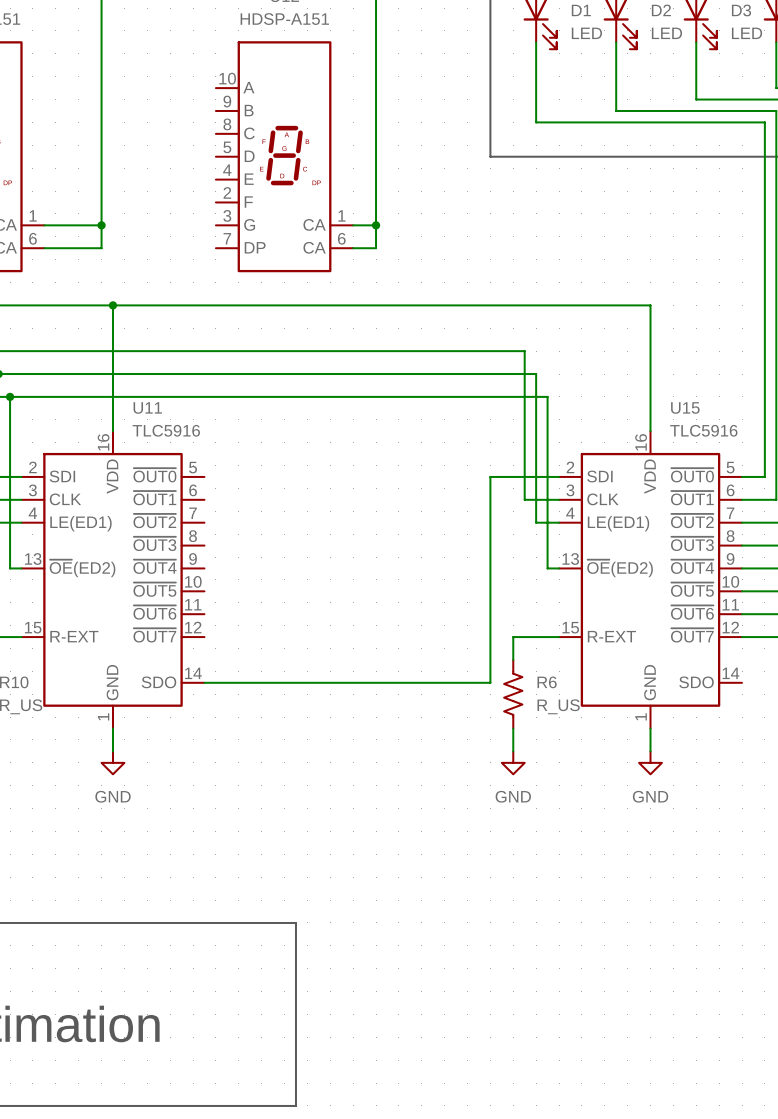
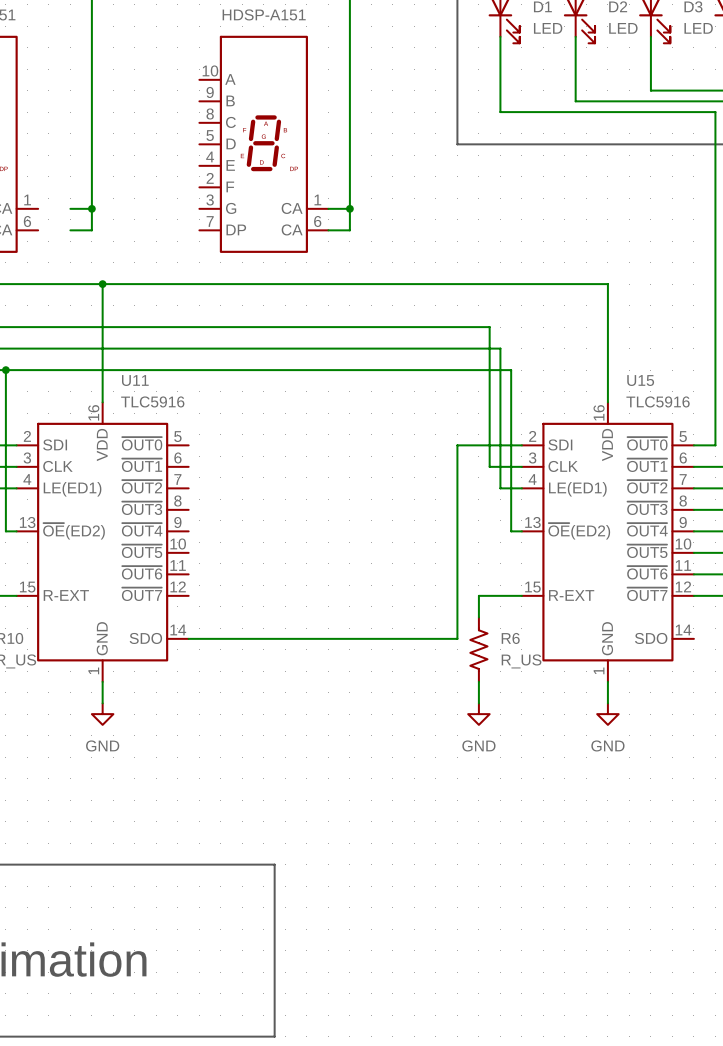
wire: (44, 225) (78, 225) -> none
wire: (44, 248) (78, 248) -> none

